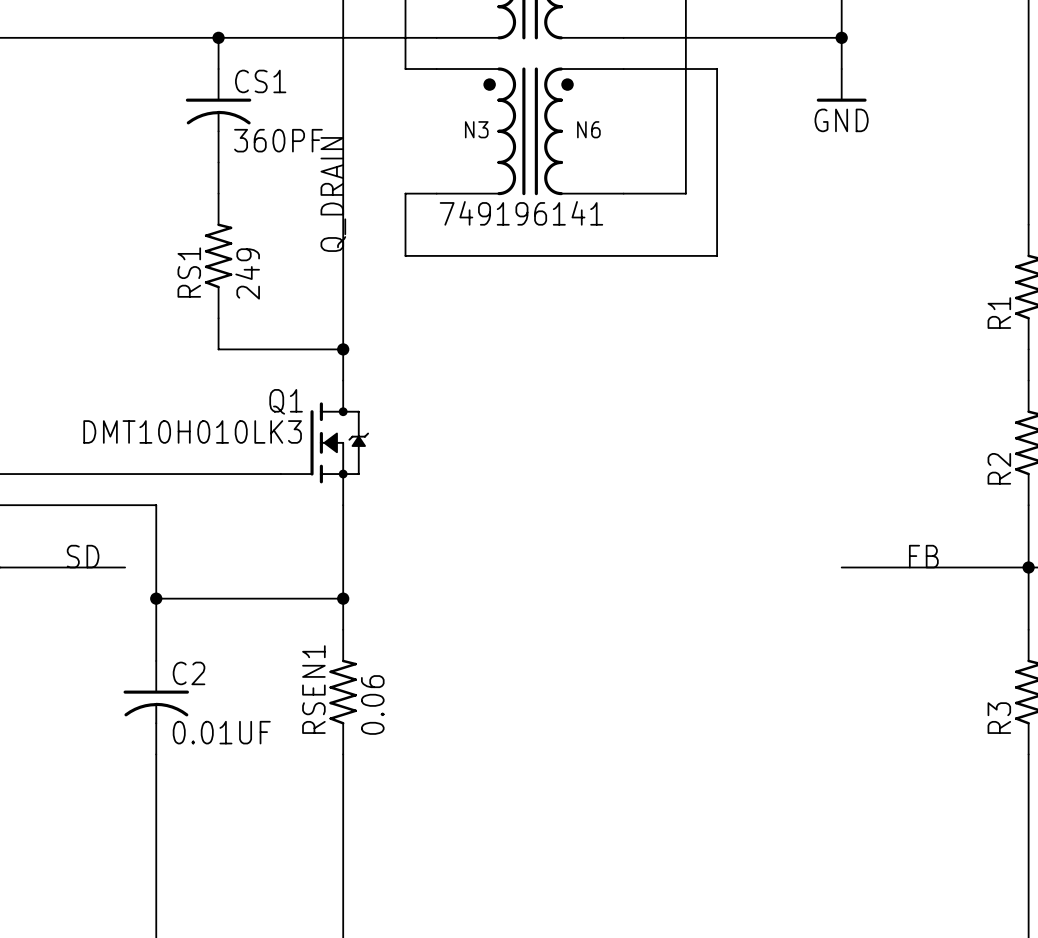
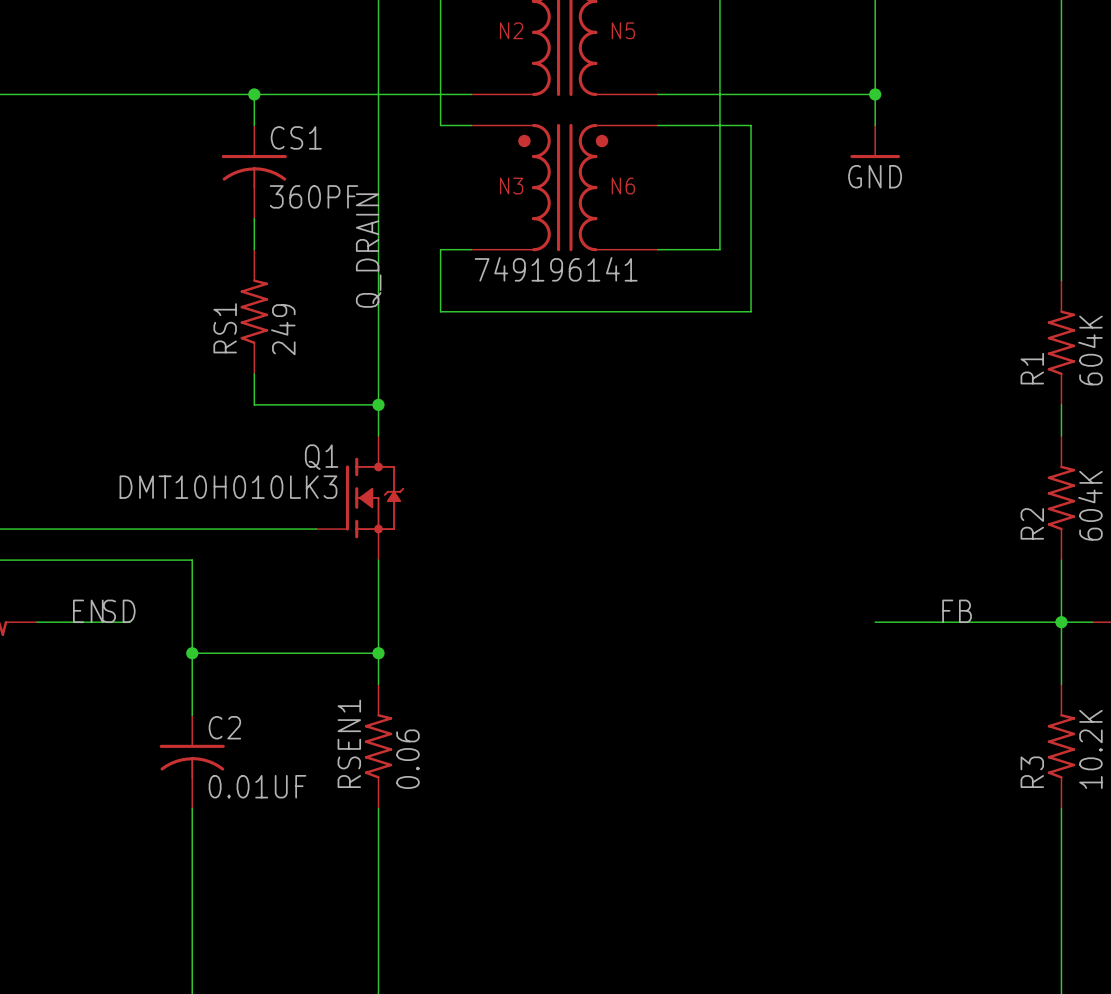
label: none -> EN (88, 611)
wire: (93, 567) (125, 567) -> none

